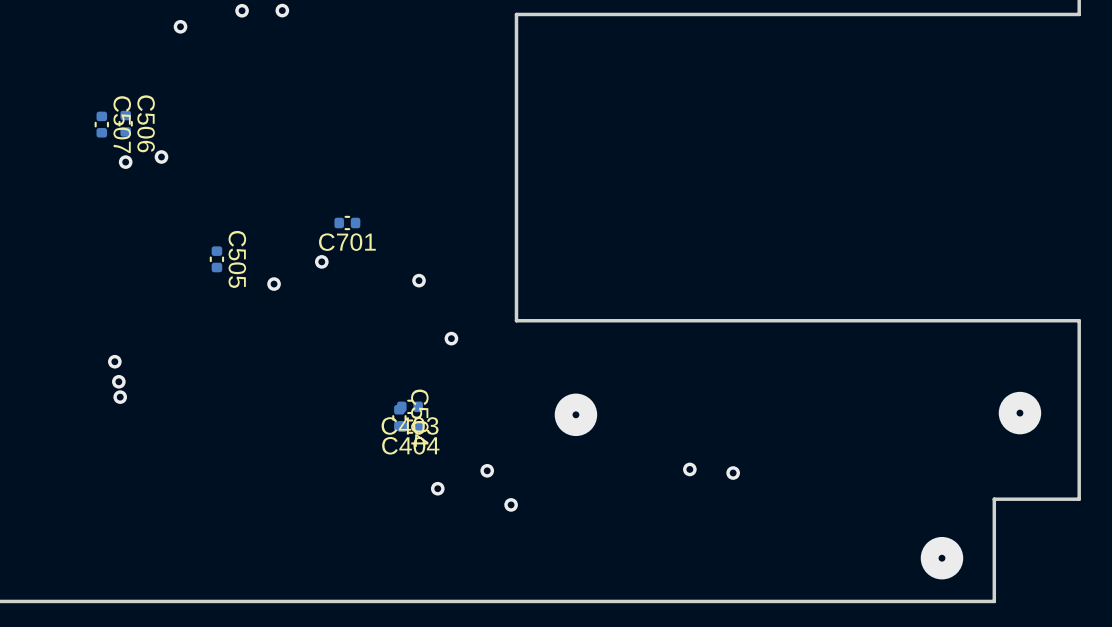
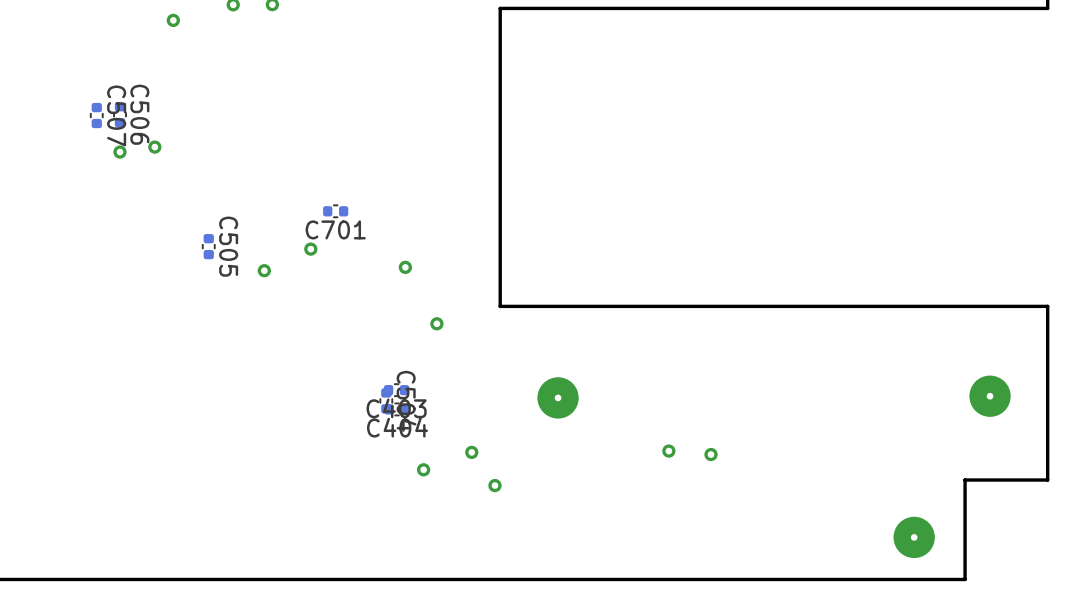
via: (114, 361) -> none
via: (118, 381) -> none
via: (120, 397) -> none

